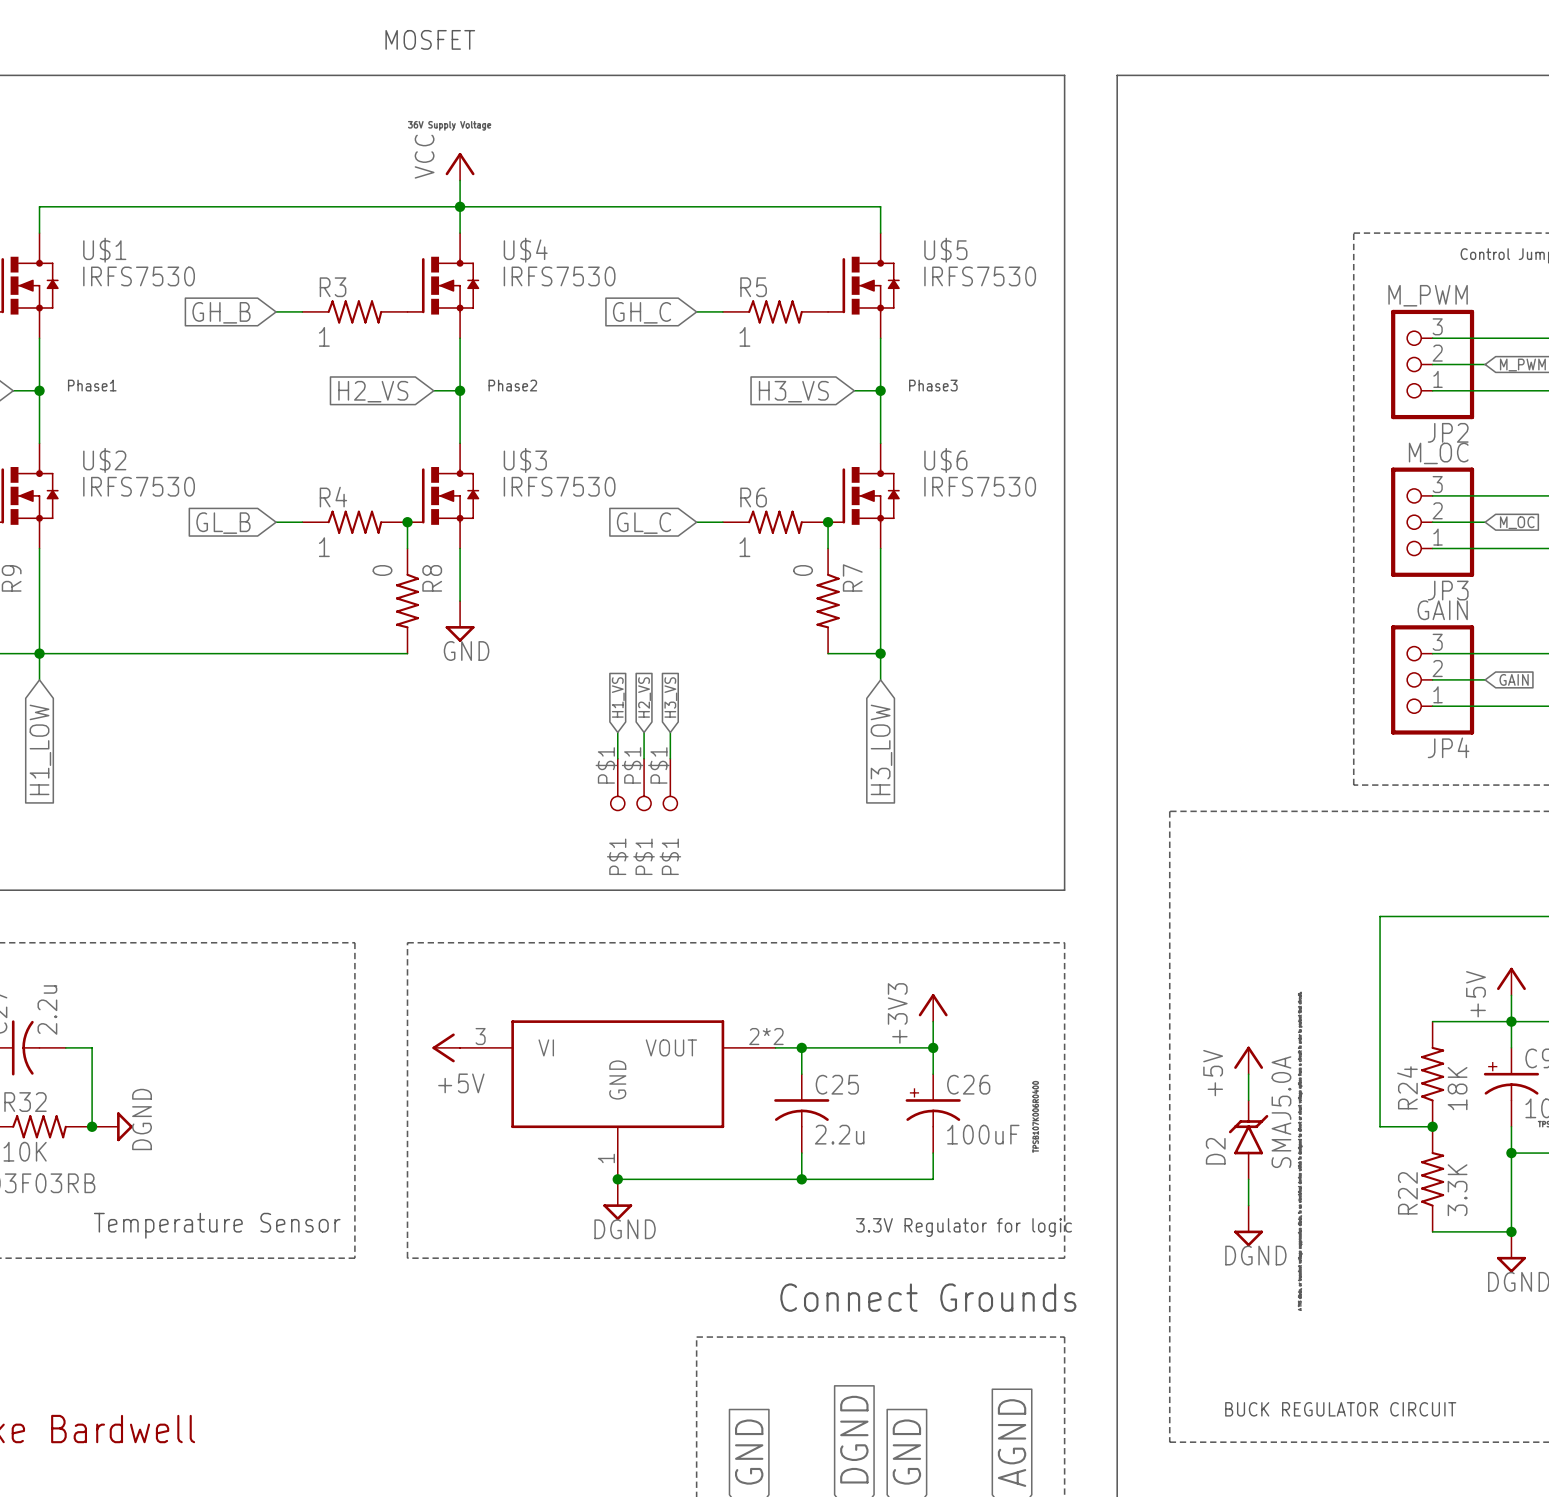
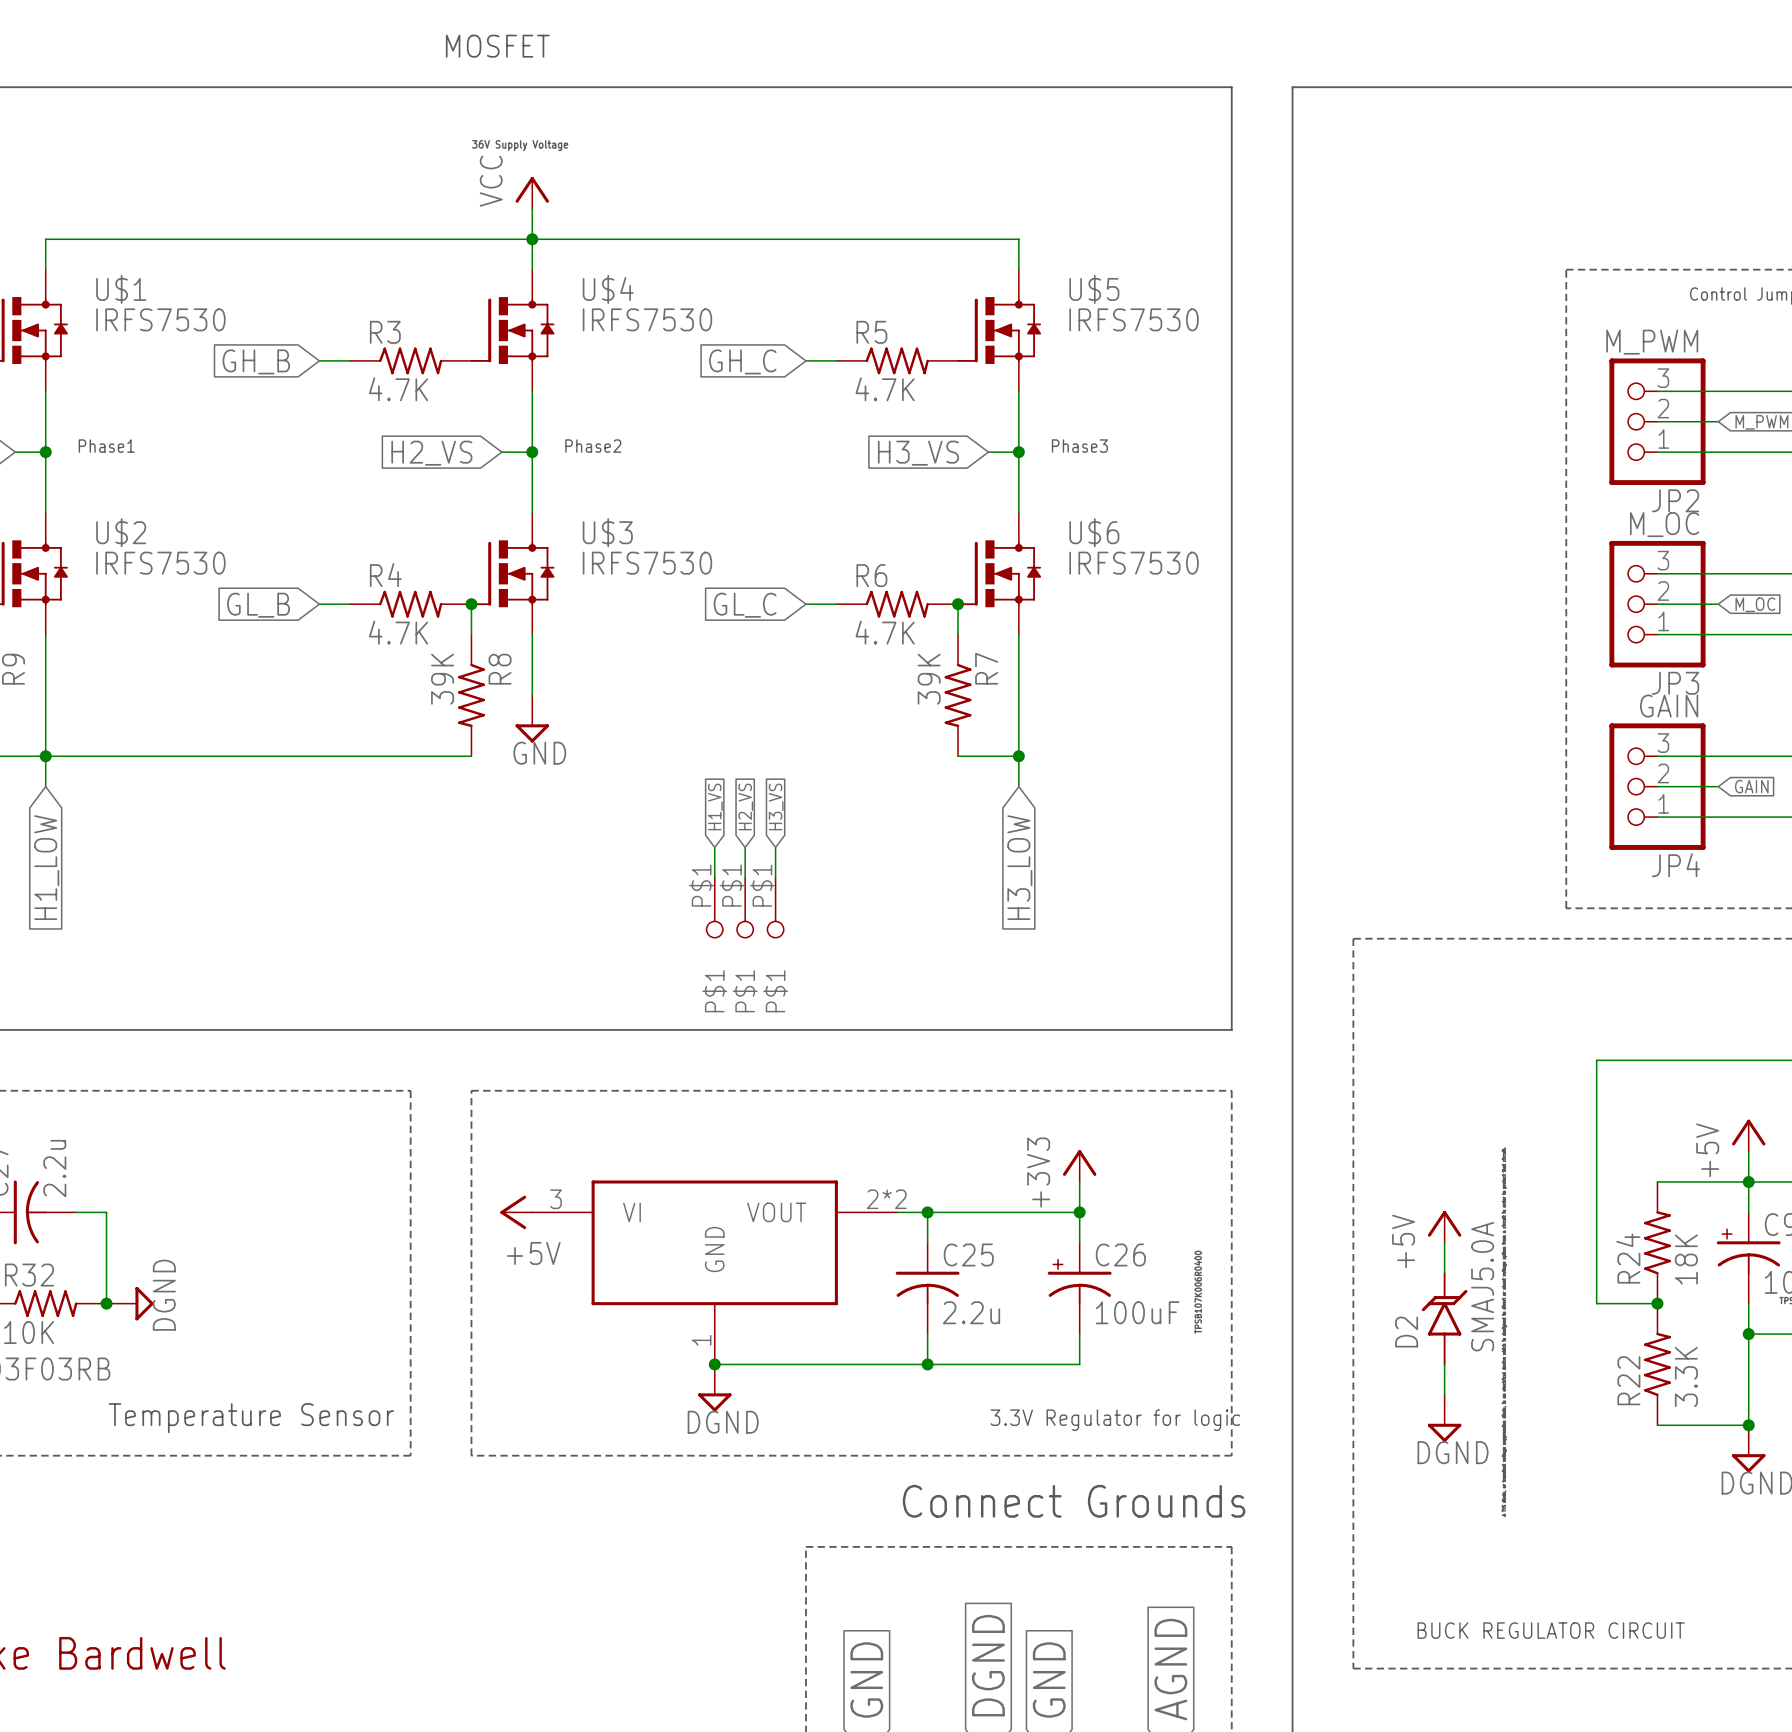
R3 value: 1 (324, 336) -> 4.7K (398, 389)
R5 value: 1 (744, 336) -> 4.7K (885, 389)
R4 value: 1 (324, 547) -> 4.7K (398, 632)
R6 value: 1 (744, 547) -> 4.7K (885, 632)
R8 value: 0 (382, 570) -> 39K (442, 679)
R7 value: 0 (803, 570) -> 39K (929, 679)

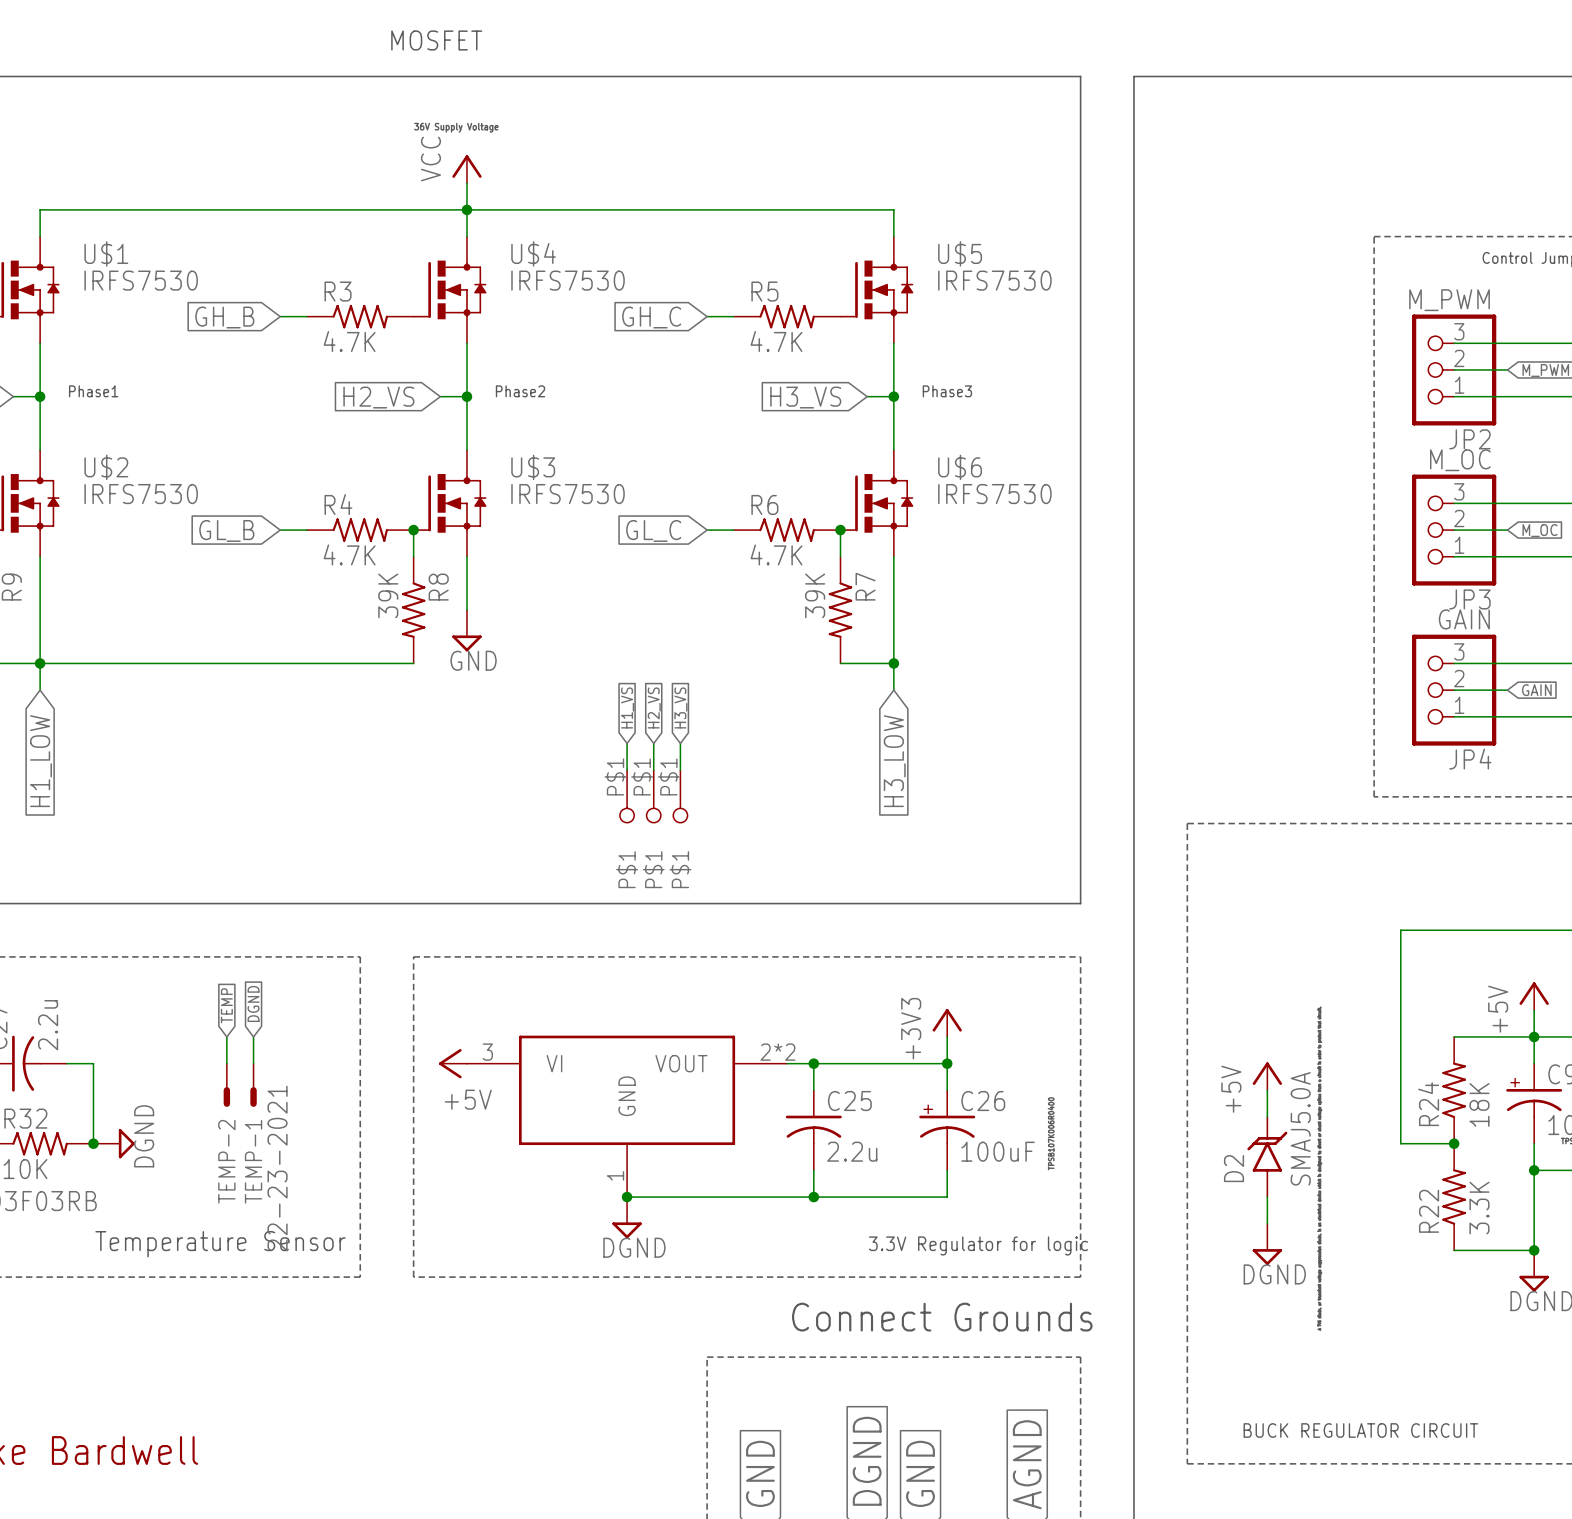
global label: none -> DGND (253, 1003)
global label: none -> TEMP (226, 1005)
wire: none -> (226, 1036) (226, 1063)
wire: none -> (253, 1036) (253, 1063)
TEMP-2: none -> (226, 1085)
TEMP-1: none -> 22-23-2021 (253, 1085)

